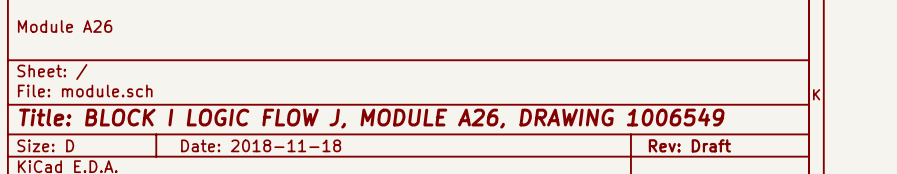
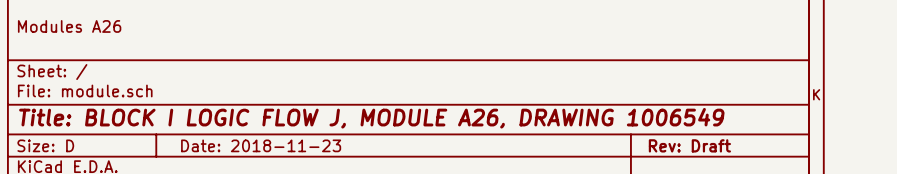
title block: Module A26 (65, 26) -> Modules A26 (69, 26)
title block: Date: 2018-11-18 (261, 145) -> Date: 2018-11-23 (261, 145)

